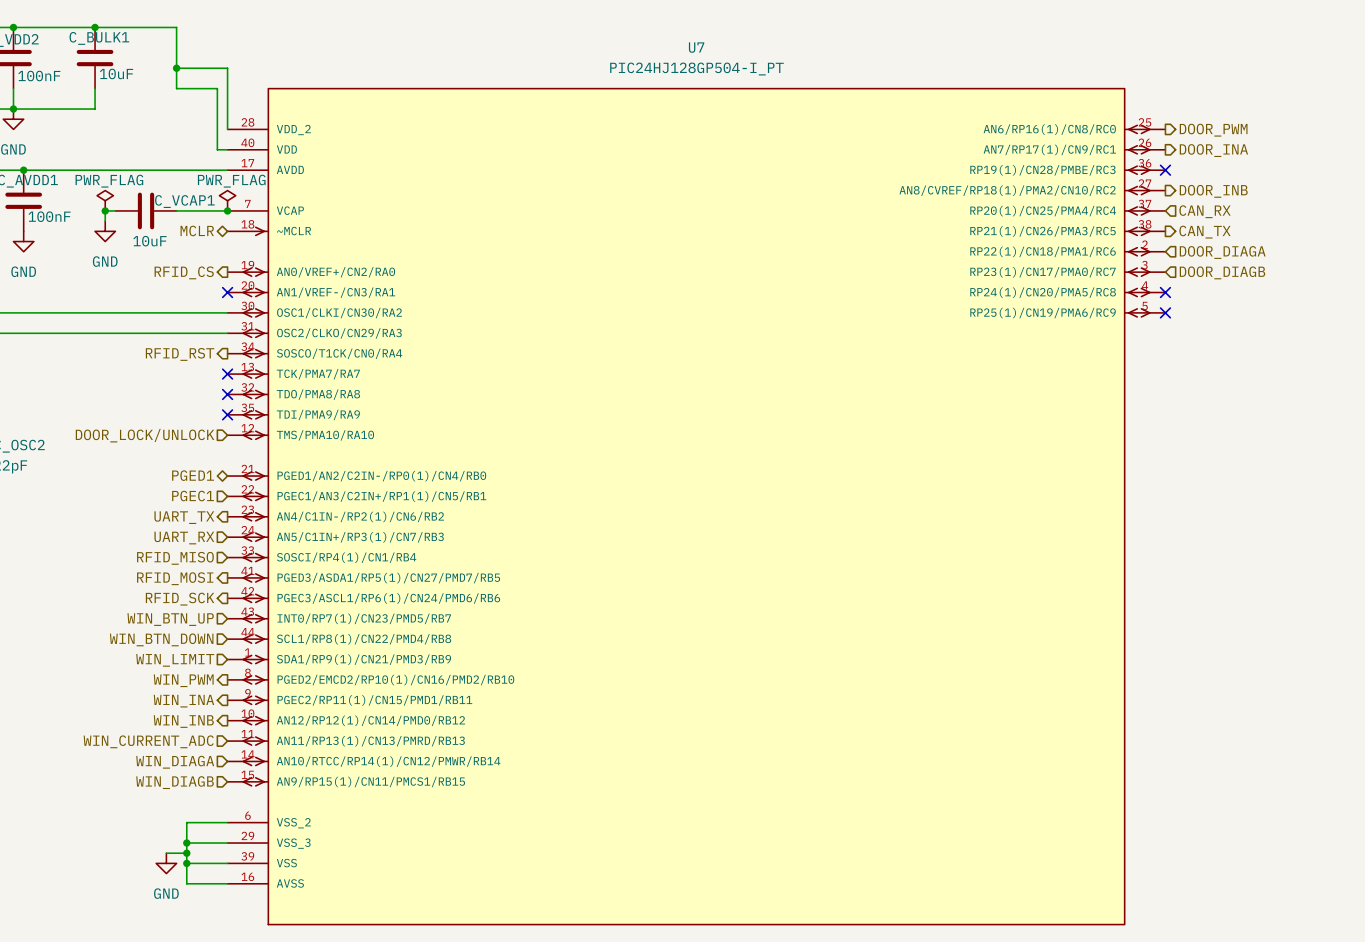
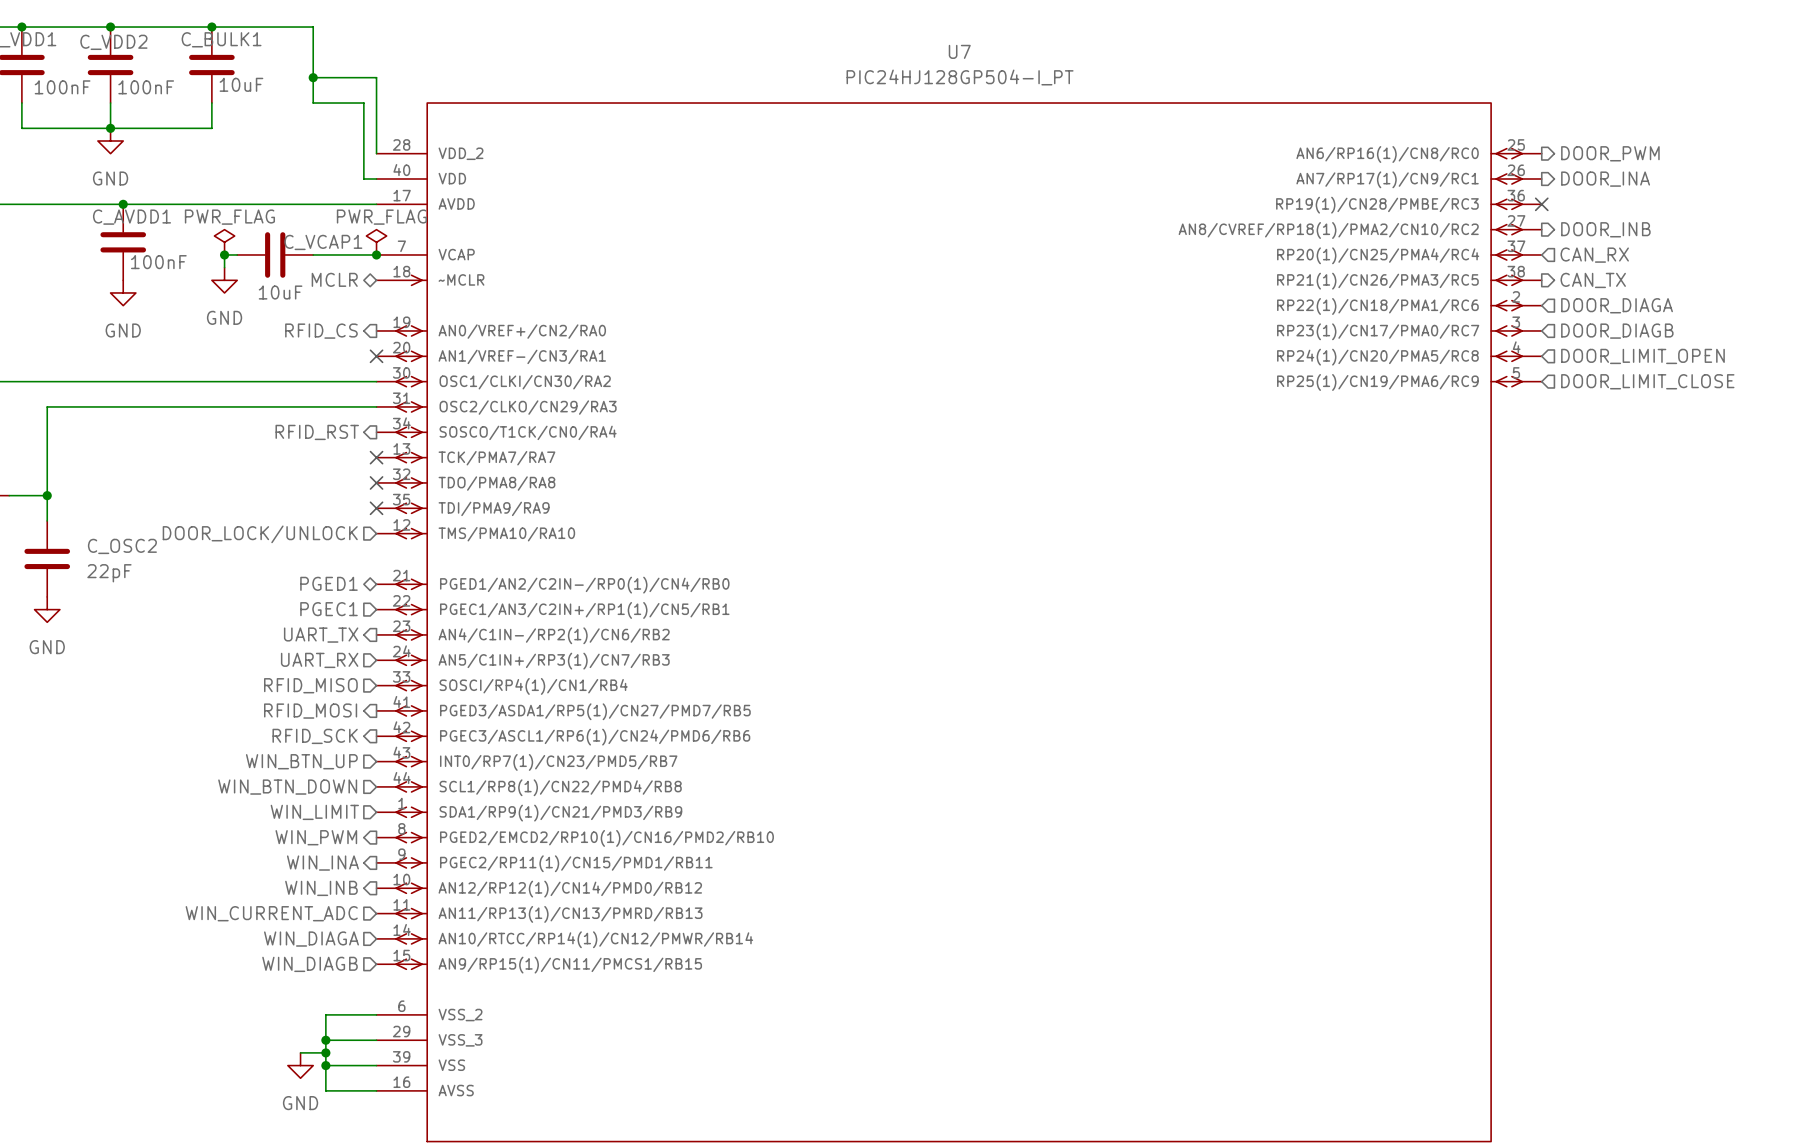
no-connect mark: (1165, 292) -> none
hierarchical label: none -> DOOR_LIMIT_OPEN (1642, 356)
no-connect mark: (1165, 312) -> none
hierarchical label: none -> DOOR_LIMIT_CLOSE (1647, 381)

